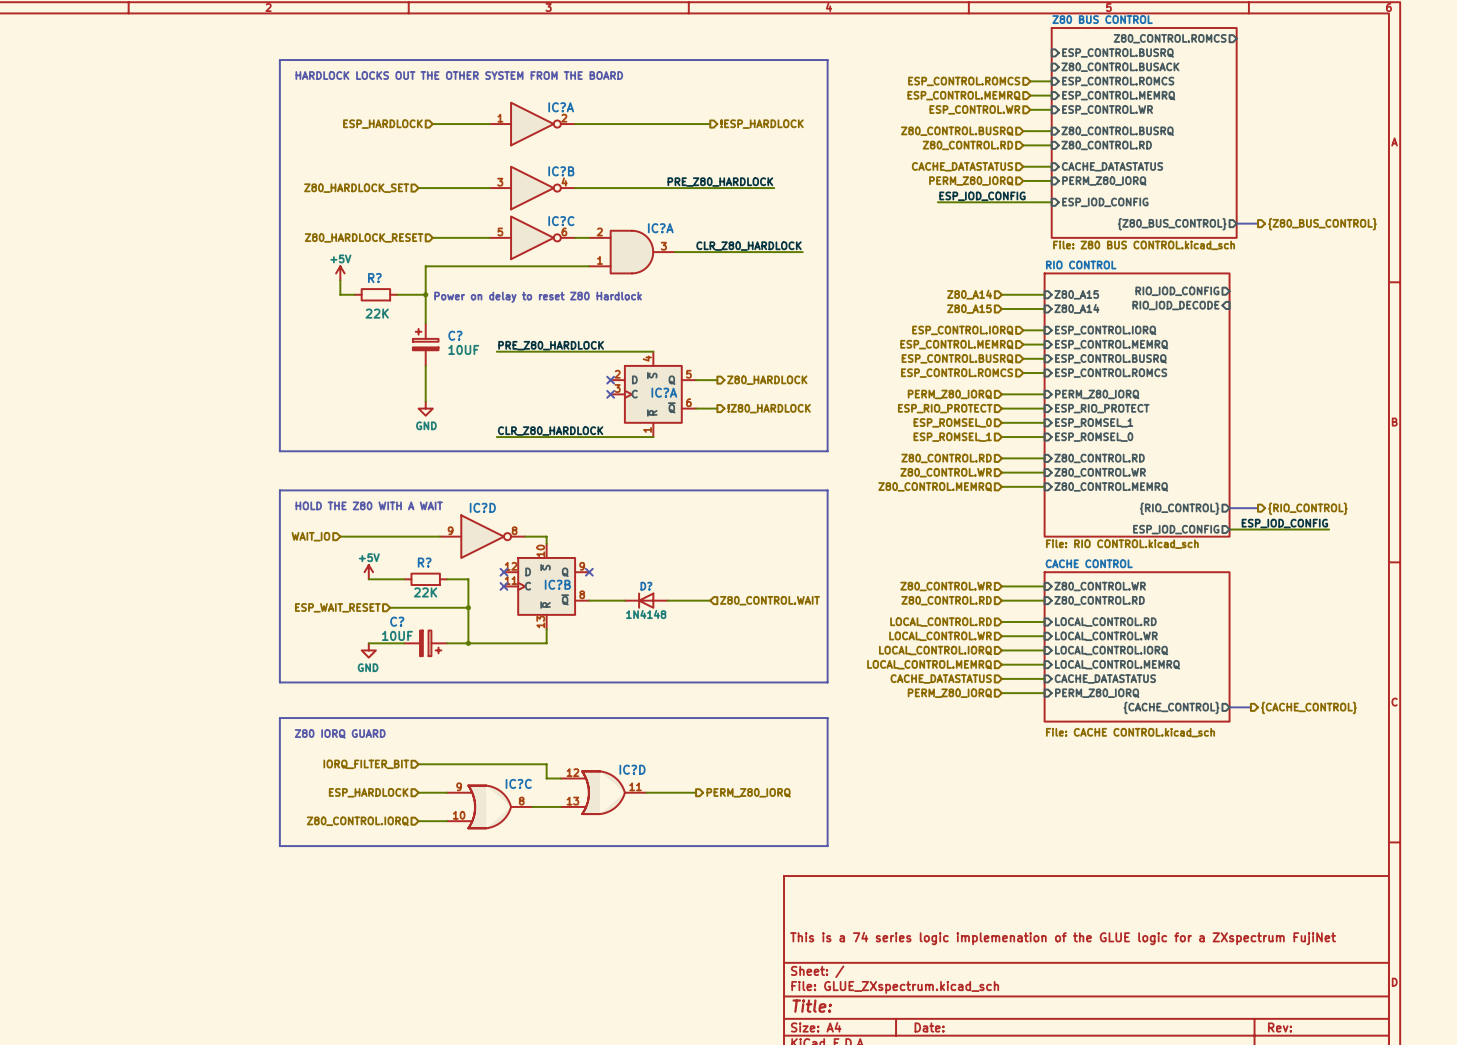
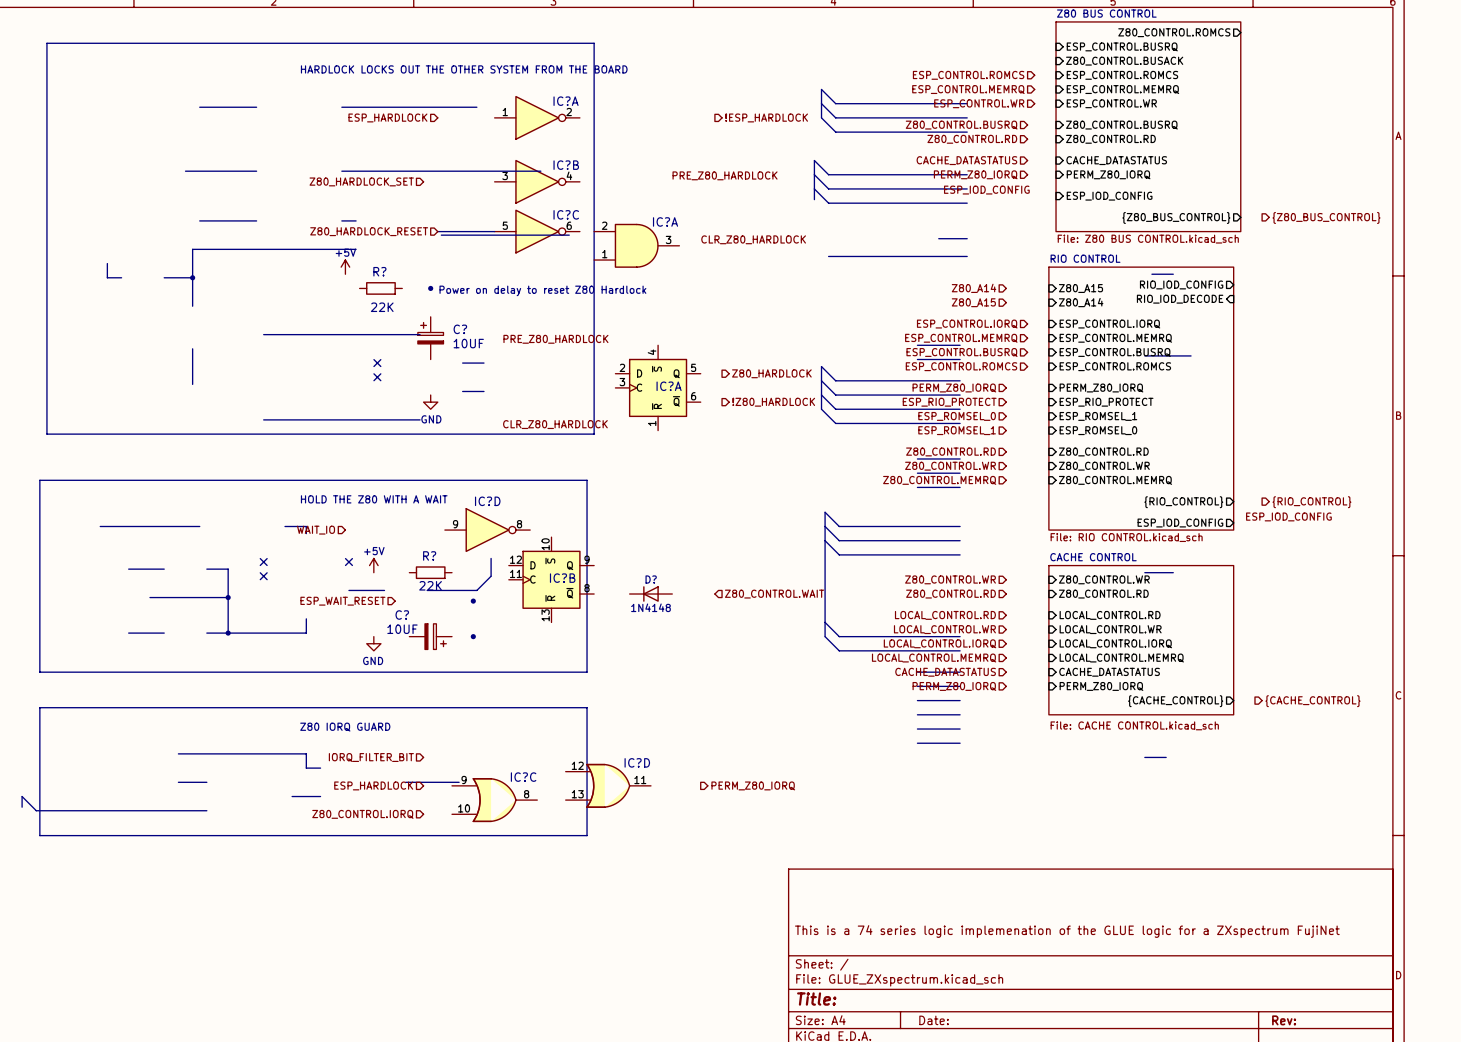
line: none -> (46, 43) (594, 43) (594, 434) (46, 434) (46, 43)
line: (279, 60) (279, 451) (827, 451) (827, 60) (279, 60) -> none
wire: (1030, 81) (1051, 81) -> none
wire: none -> (821, 89) (835, 103) (967, 103)
bus: none -> (821, 89) (821, 117)
wire: (1030, 95) (1051, 95) -> none
wire: none -> (821, 103) (835, 117) (967, 117)
wire: (1030, 109) (1051, 109) -> none
wire: none -> (199, 107) (256, 107)
wire: none -> (341, 107) (476, 107)
wire: (432, 124) (489, 124) -> none
wire: (575, 124) (710, 124) -> none
wire: none -> (821, 117) (835, 132) (967, 132)
wire: (1023, 131) (1051, 131) -> none
wire: (1023, 145) (1051, 145) -> (938, 238) (967, 238)
wire: none -> (814, 160) (828, 174) (967, 174)
bus: none -> (814, 160) (814, 199)
wire: (1023, 166) (1051, 166) -> none
wire: none -> (185, 171) (256, 171)
wire: none -> (341, 171) (540, 171)
wire: none -> (814, 174) (828, 188) (967, 188)
wire: (1023, 180) (1051, 180) -> none
wire: (418, 188) (489, 188) -> none
wire: (575, 188) (774, 188) -> none
wire: none -> (814, 188) (828, 203) (967, 203)
wire: (937, 202) (1051, 202) -> none
bus: (1236, 223) (1258, 223) -> (1151, 274) (1173, 274)
wire: none -> (199, 220) (256, 220)
wire: none -> (341, 220) (356, 220)
wire: (575, 237) (589, 237) -> none
wire: none -> (441, 235) (569, 235)
wire: (674, 252) (802, 252) -> none
wire: none -> (356, 249) (192, 249) (192, 306)
wire: none -> (828, 256) (967, 256)
wire: (589, 266) (425, 266) (425, 323) -> none
wire: none -> (107, 263) (107, 277) (121, 277)
wire: (340, 280) (340, 294) (354, 294) -> none
wire: none -> (164, 277) (192, 277)
junction: none -> (192, 277)
wire: (397, 294) (425, 294) -> none
wire: (1001, 294) (1044, 294) -> (917, 345) (960, 345)
wire: (1001, 309) (1044, 309) -> (917, 359) (960, 359)
wire: (1023, 330) (1044, 330) -> none
wire: none -> (263, 334) (420, 334)
wire: (1023, 344) (1044, 344) -> none
wire: (496, 351) (653, 351) -> none
wire: none -> (192, 348) (192, 384)
wire: (1023, 358) (1044, 358) -> none
wire: none -> (1144, 355) (1191, 355)
wire: (425, 365) (425, 401) -> none
no-connect mark: none -> (377, 363)
wire: none -> (462, 363) (483, 363)
wire: none -> (821, 366) (835, 380) (960, 380)
bus: none -> (821, 366) (821, 409)
wire: (1023, 373) (1044, 373) -> none
no-connect mark: (610, 380) -> none
wire: (696, 380) (717, 380) -> none
no-connect mark: none -> (377, 377)
wire: none -> (821, 380) (835, 395) (960, 395)
no-connect mark: (610, 394) -> none
wire: (1001, 394) (1044, 394) -> none
wire: none -> (462, 391) (483, 391)
wire: none -> (821, 395) (835, 409) (960, 409)
wire: (696, 408) (717, 408) -> none
wire: (1001, 408) (1044, 408) -> (917, 458) (960, 458)
wire: none -> (821, 409) (835, 423) (960, 423)
wire: (1001, 422) (1044, 422) -> (917, 473) (960, 473)
wire: none -> (263, 419) (420, 419)
wire: (496, 437) (653, 437) -> none
wire: (1001, 437) (1044, 437) -> (917, 487) (960, 487)
wire: (1001, 458) (1044, 458) -> none
wire: (1001, 472) (1044, 472) -> none
line: none -> (39, 480) (587, 480) (587, 672) (39, 672) (39, 480)
wire: (1001, 486) (1044, 486) -> none
line: (279, 490) (827, 490) (827, 682) (279, 682) (279, 490) -> none
bus: (1229, 508) (1258, 508) -> (1144, 572) (1173, 572)
wire: none -> (825, 512) (839, 526)
bus: none -> (825, 512) (825, 636)
wire: (1229, 529) (1329, 529) -> none
wire: none -> (100, 526) (199, 526)
wire: none -> (285, 526) (306, 526) (306, 533)
wire: none -> (825, 526) (839, 540)
wire: none -> (839, 526) (960, 526)
wire: (340, 536) (439, 536) -> none
wire: (525, 536) (546, 536) (546, 543) -> none
wire: none -> (825, 540) (839, 554)
wire: none -> (839, 540) (960, 540)
wire: none -> (839, 554) (960, 554)
bus: none -> (491, 558) (491, 576)
no-connect mark: none -> (263, 562)
no-connect mark: none -> (348, 562)
no-connect mark: (503, 572) -> none
no-connect mark: (589, 572) -> none
wire: none -> (128, 569) (164, 569)
wire: none -> (206, 569) (228, 569) (228, 633)
wire: (368, 579) (404, 579) -> (348, 590) (384, 590)
wire: (447, 579) (468, 579) (468, 643) -> none
no-connect mark: none -> (263, 576)
wire: none -> (491, 576) (476, 590)
no-connect mark: (503, 586) -> none
wire: (1001, 586) (1044, 586) -> none
wire: none -> (427, 590) (476, 590)
wire: (589, 600) (624, 600) -> none
wire: (667, 600) (710, 600) -> none
wire: (1001, 600) (1044, 600) -> none
wire: none -> (149, 597) (228, 597)
junction: none -> (228, 597)
wire: (390, 607) (468, 607) -> none
wire: (1001, 622) (1044, 622) -> (917, 672) (960, 672)
wire: none -> (306, 618) (306, 633) (206, 633)
wire: (546, 629) (546, 643) (447, 643) -> none
wire: none -> (825, 622) (839, 636)
wire: (1001, 636) (1044, 636) -> (917, 686) (960, 686)
wire: none -> (128, 633) (164, 633)
junction: none -> (228, 633)
wire: (368, 643) (404, 643) -> none
wire: none -> (825, 636) (839, 650)
wire: none -> (839, 636) (960, 636)
wire: (1001, 650) (1044, 650) -> (917, 700) (960, 700)
wire: none -> (839, 650) (960, 650)
wire: (1001, 664) (1044, 664) -> (917, 714) (960, 714)
wire: (1001, 678) (1044, 678) -> (917, 729) (960, 729)
wire: (1001, 693) (1044, 693) -> (917, 743) (960, 743)
bus: (1229, 707) (1250, 707) -> (1144, 757) (1166, 757)
line: none -> (39, 707) (39, 835) (587, 835) (587, 707) (39, 707)
line: (279, 718) (827, 718) (827, 846) (279, 846) (279, 718) -> none
wire: none -> (178, 753) (306, 753) (306, 768) (320, 768)
wire: (418, 764) (546, 764) (546, 778) (560, 778) -> none
wire: none -> (178, 782) (206, 782)
wire: none -> (405, 782) (459, 782)
wire: (418, 792) (447, 792) -> (292, 796) (320, 796)
wire: (646, 792) (696, 792) -> none
wire: none -> (22, 796) (36, 810) (206, 810)
bus: none -> (22, 796) (22, 807)
wire: (532, 806) (560, 806) -> none
wire: (418, 821) (447, 821) -> none

